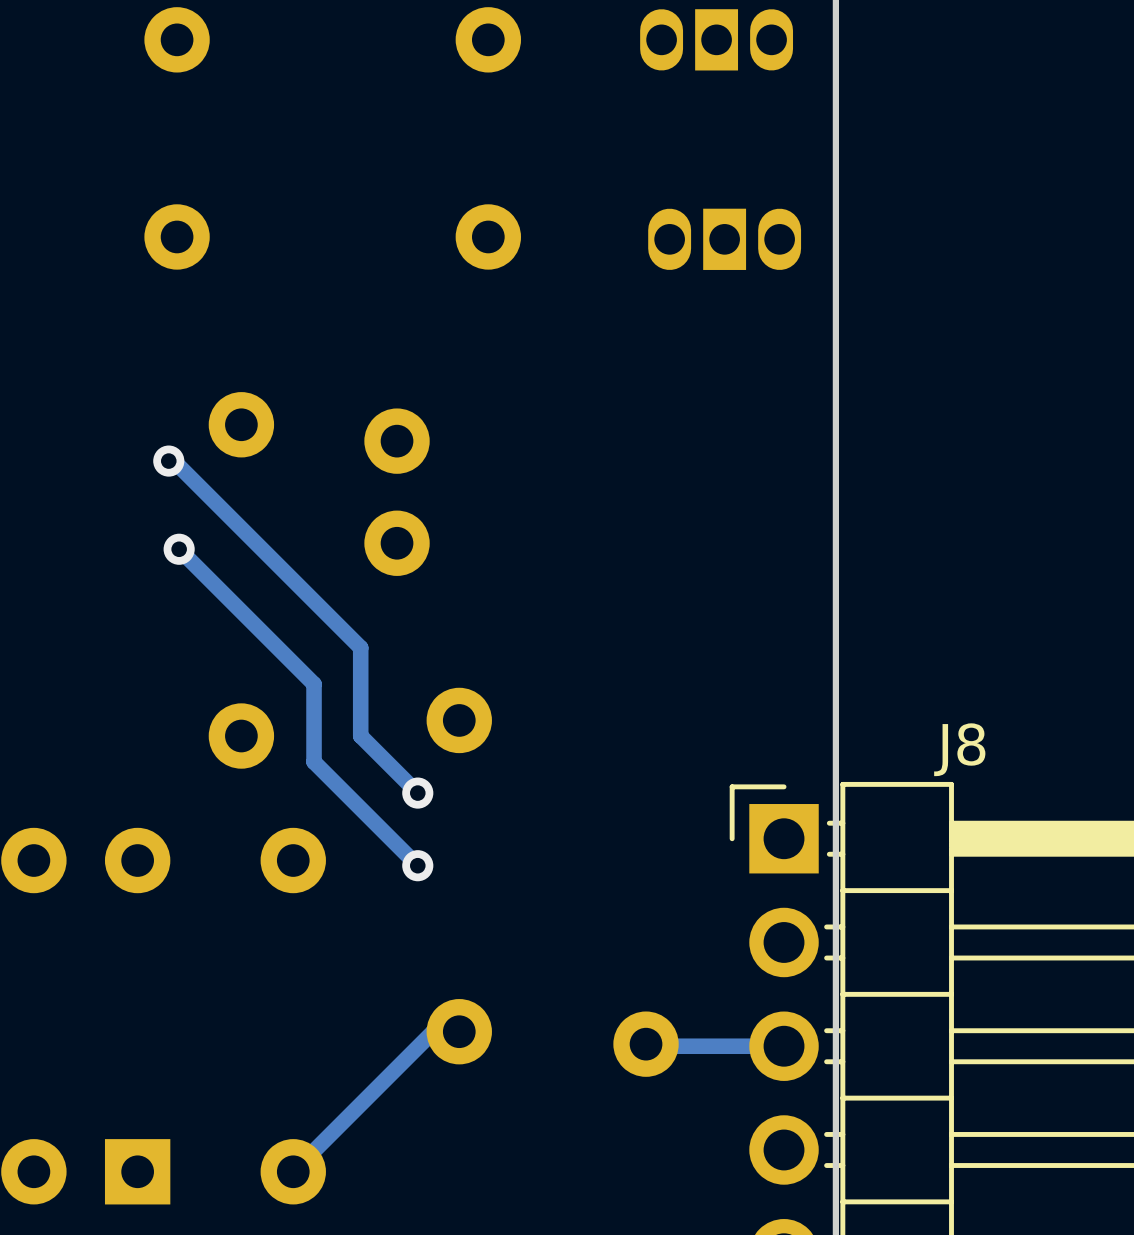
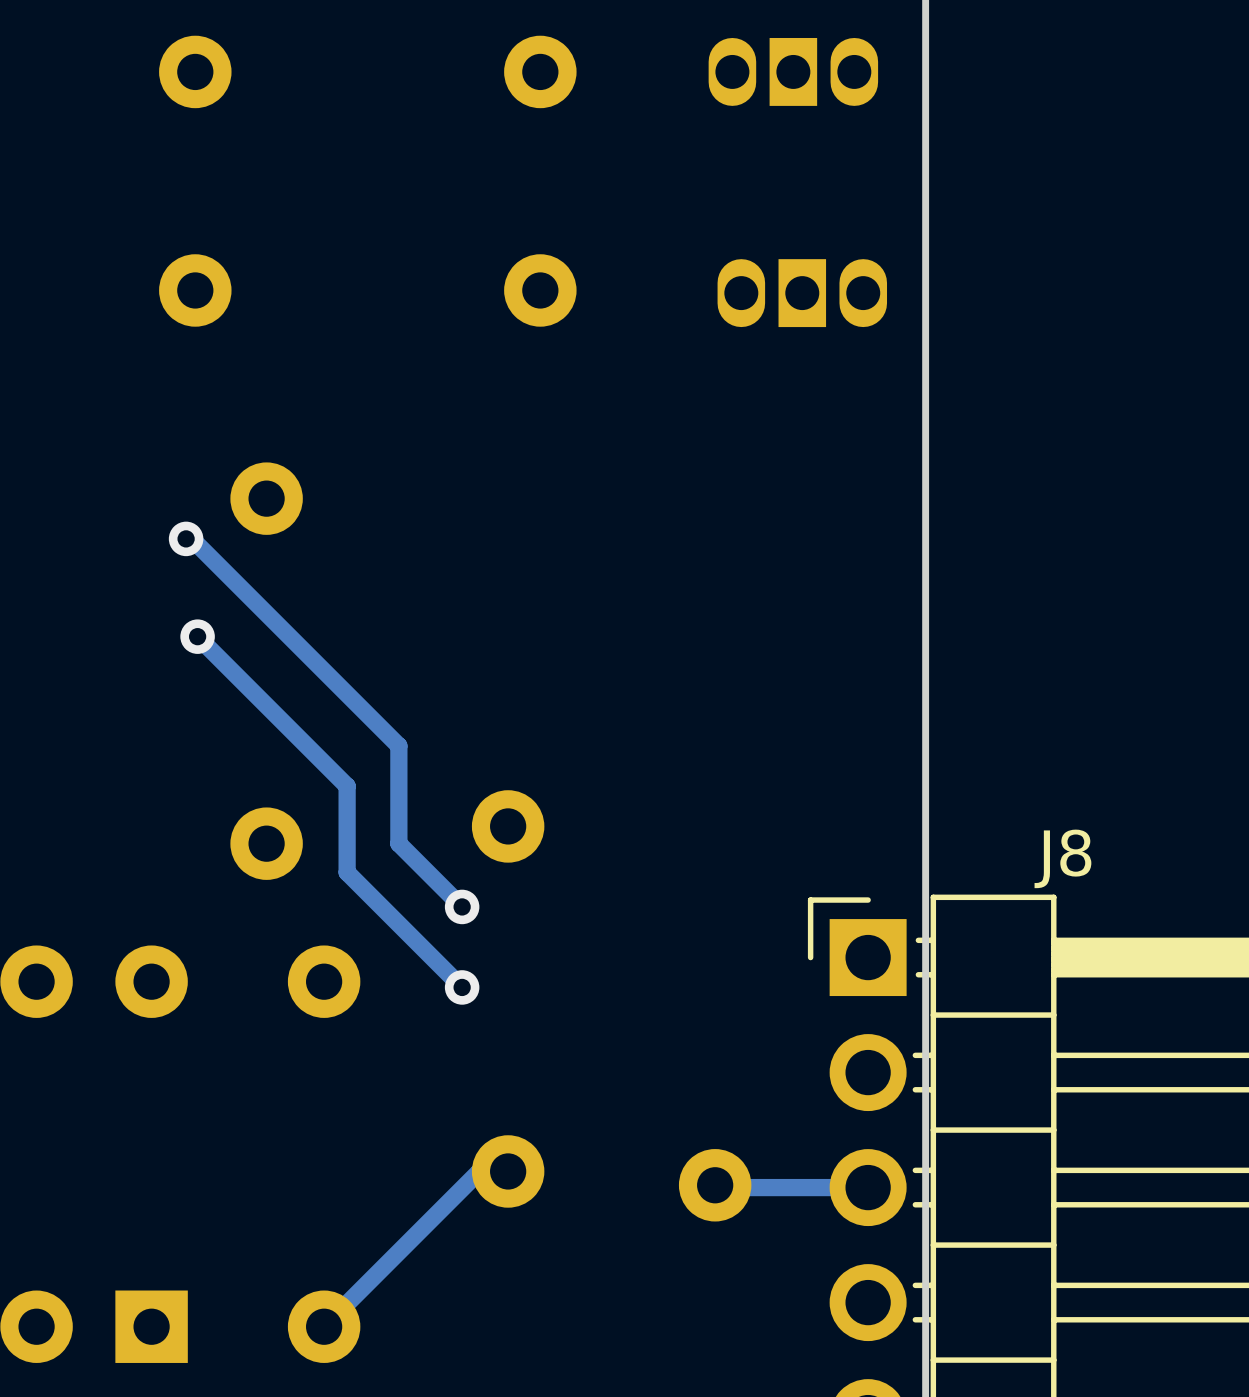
part: (397, 492) -> none

